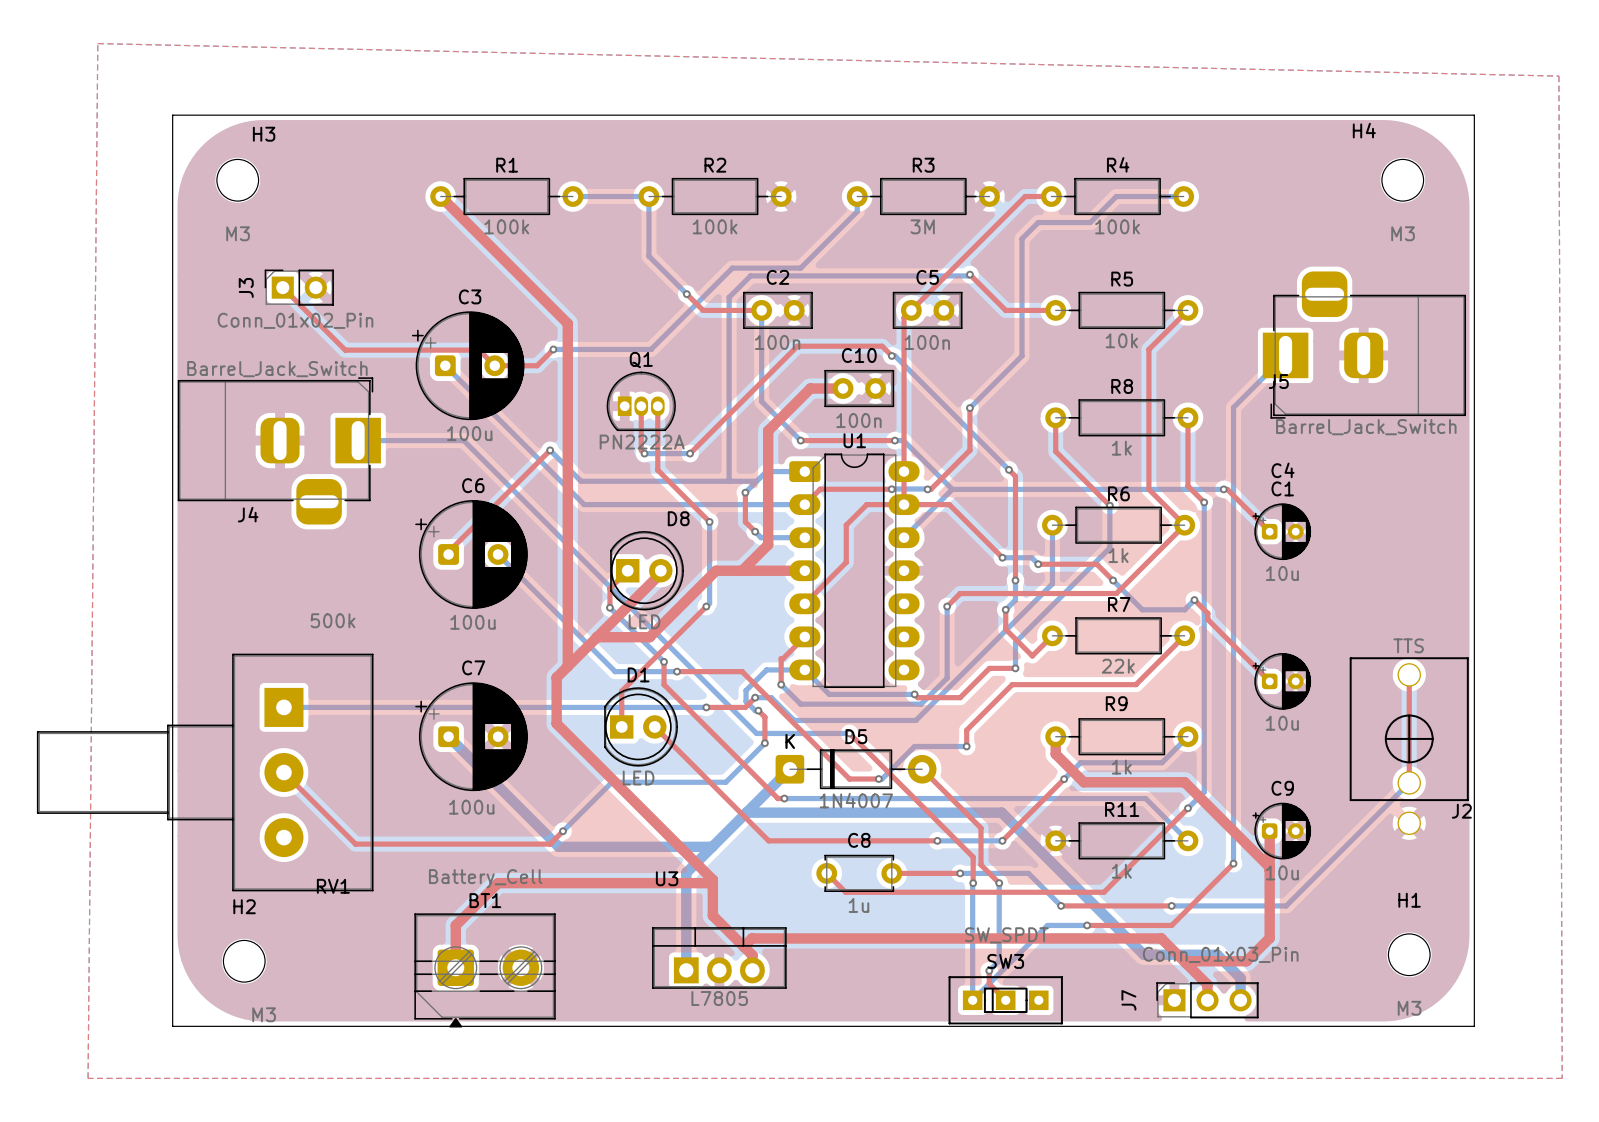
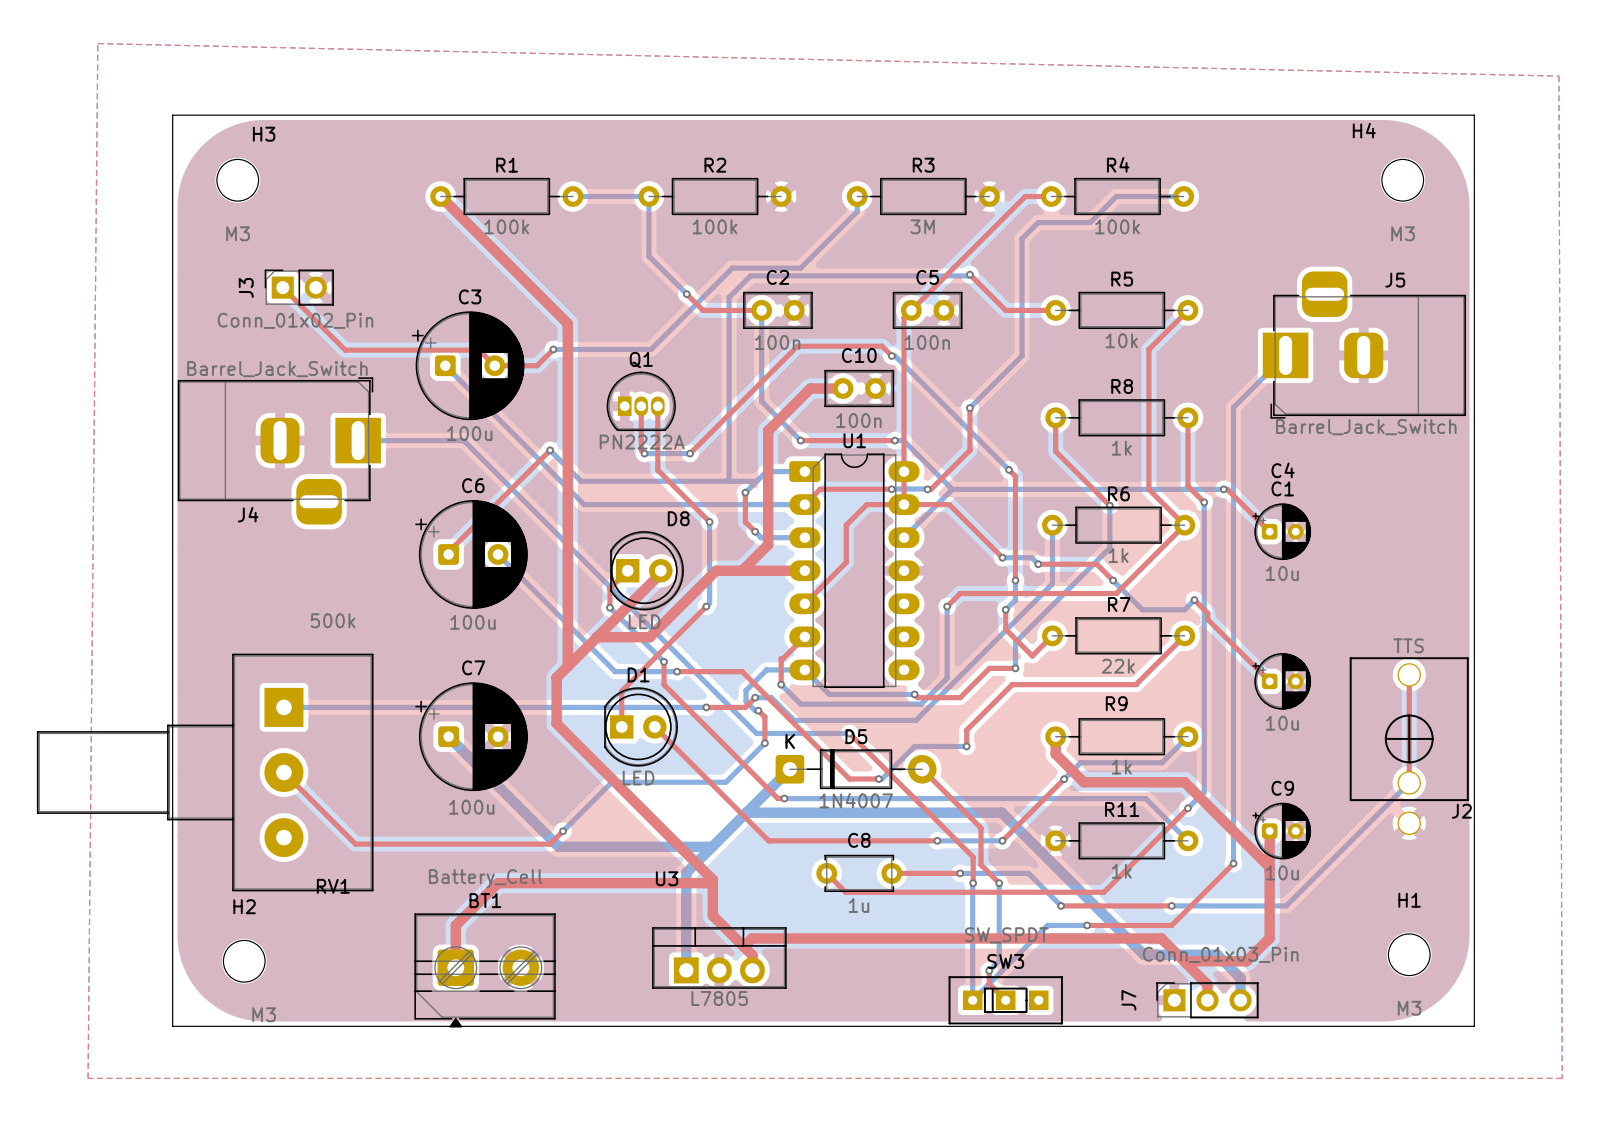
J5 name position: J5 (1278, 381) -> J5 (1395, 280)

